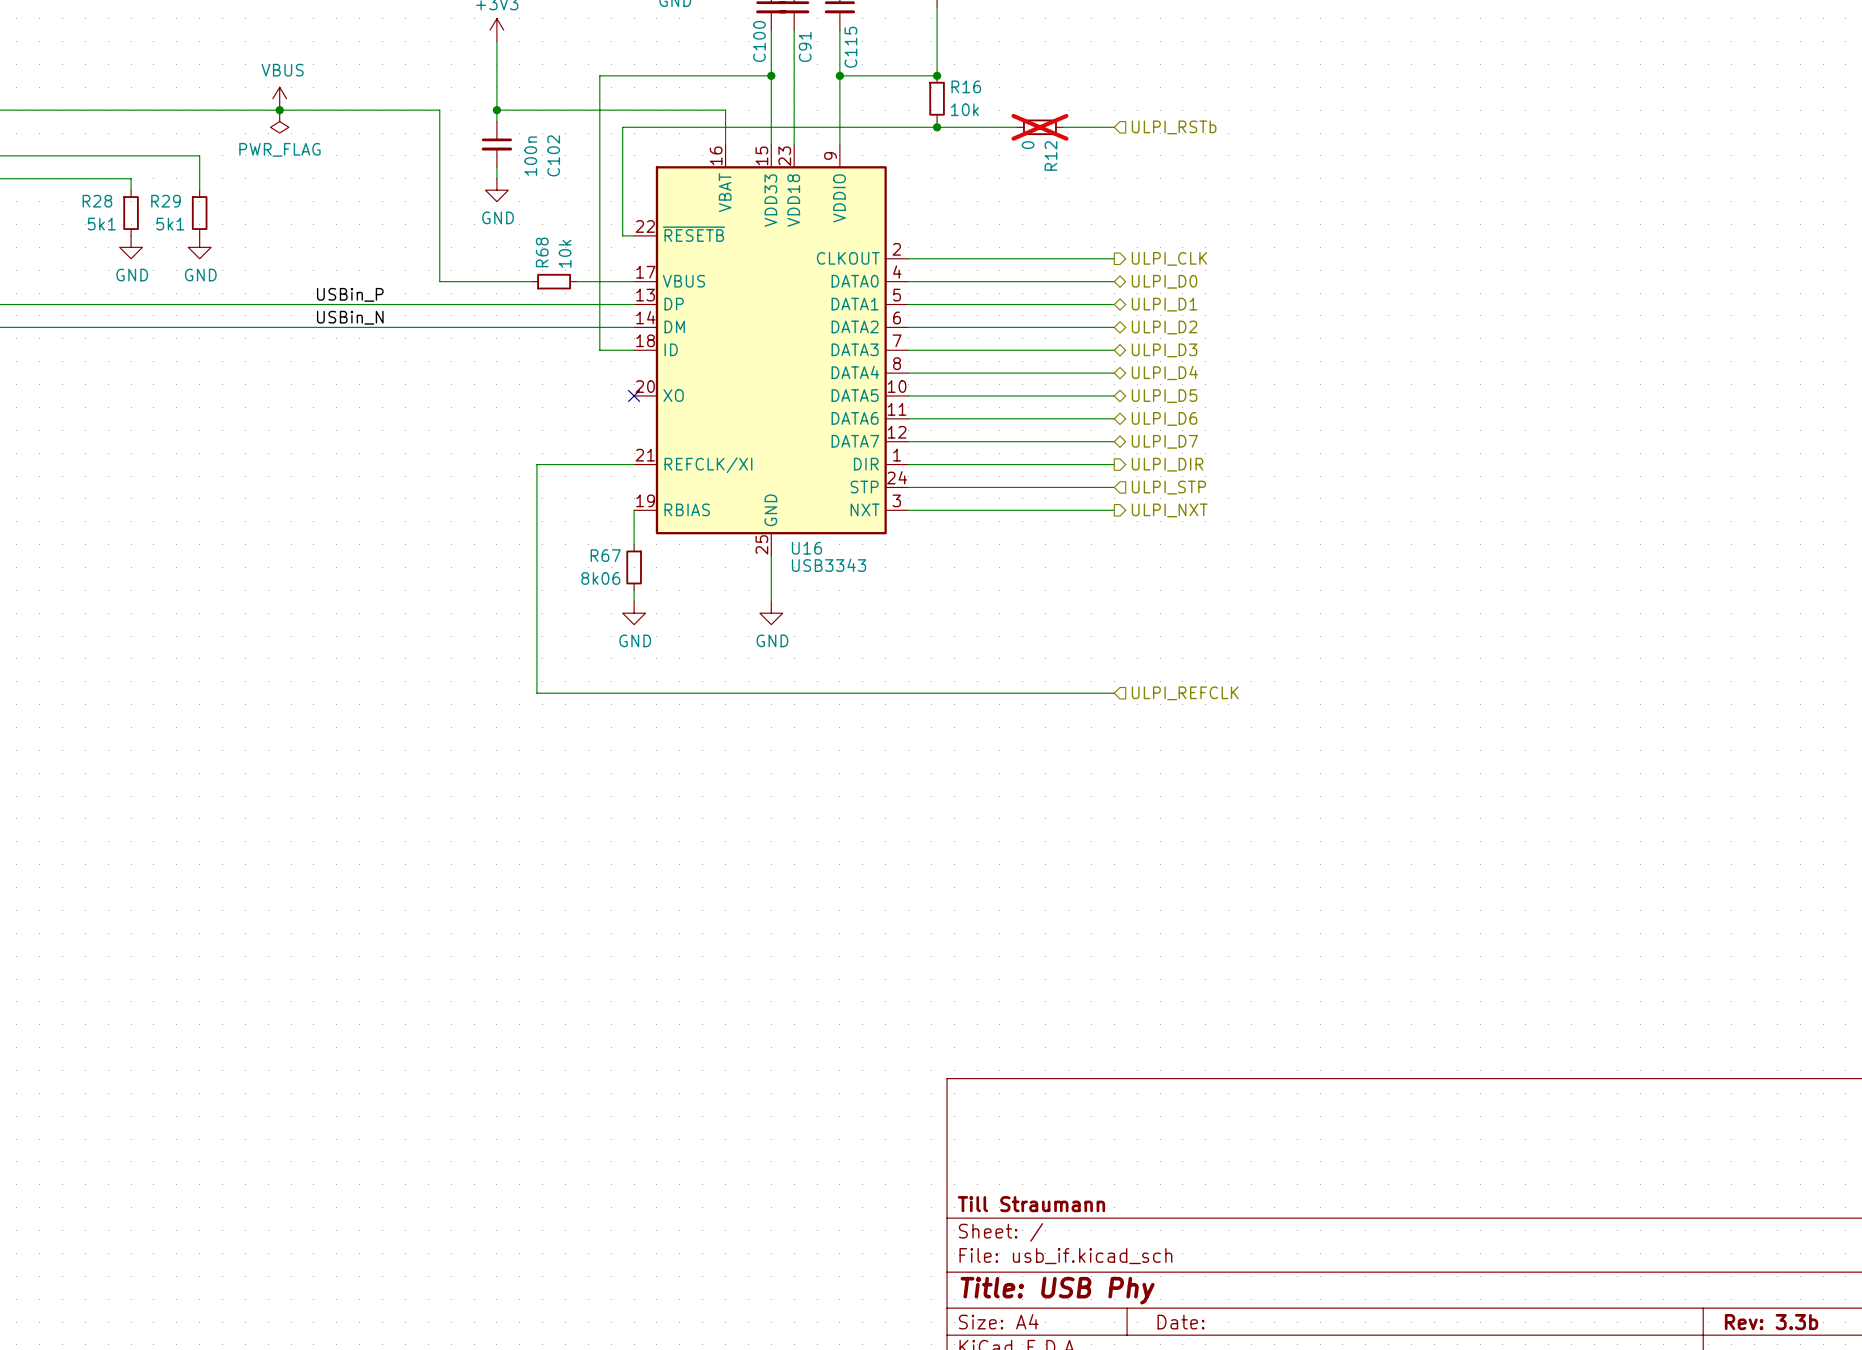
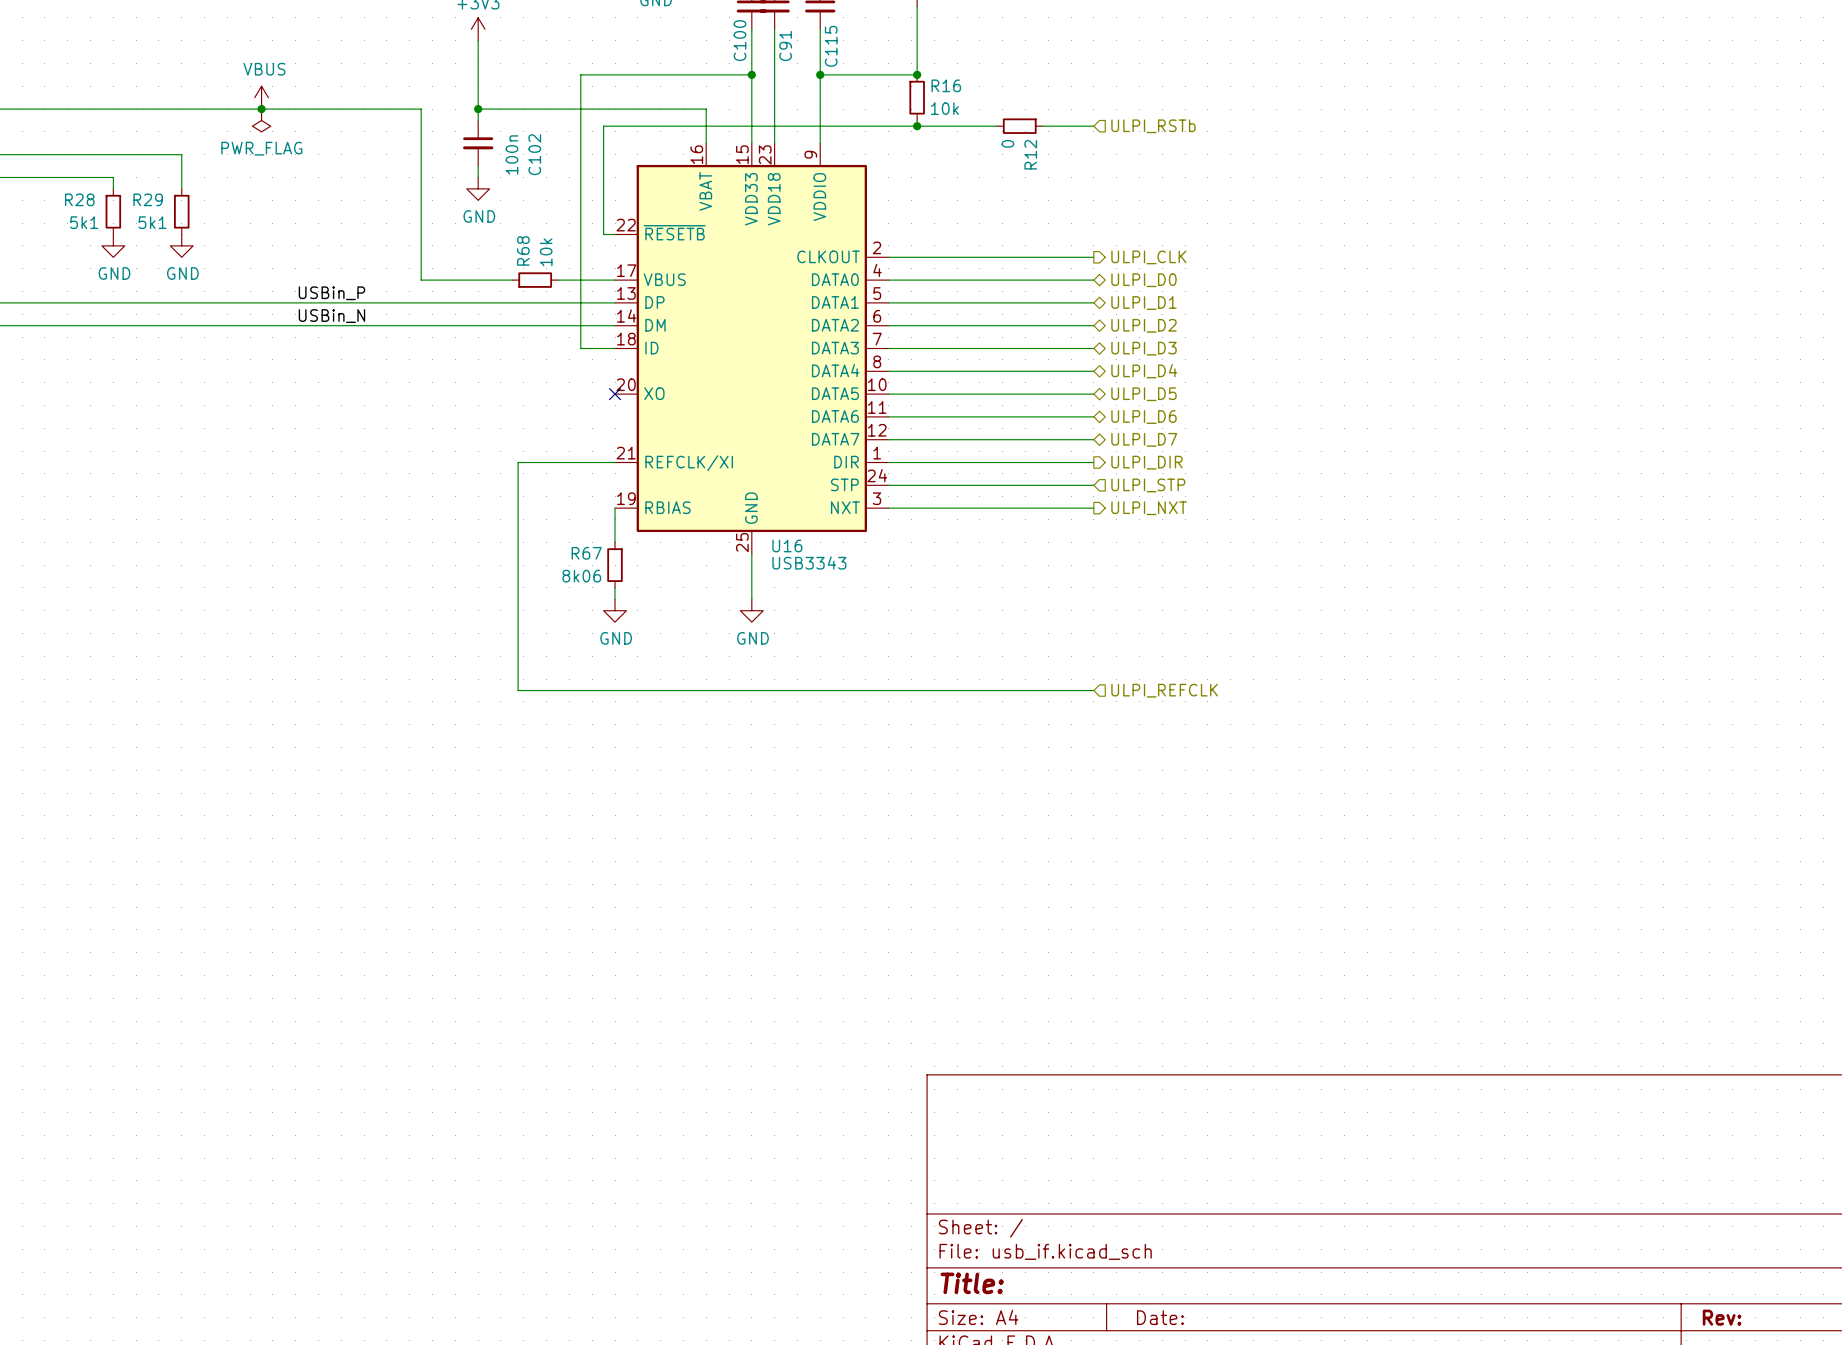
R12 do-not-place cross: (1039, 127) -> none
title block: Till Straumann (1031, 1204) -> none
title block: Title: USB Phy (1057, 1290) -> Title: (972, 1283)
title block: Rev: 3.3b (1771, 1322) -> Rev: (1722, 1317)

